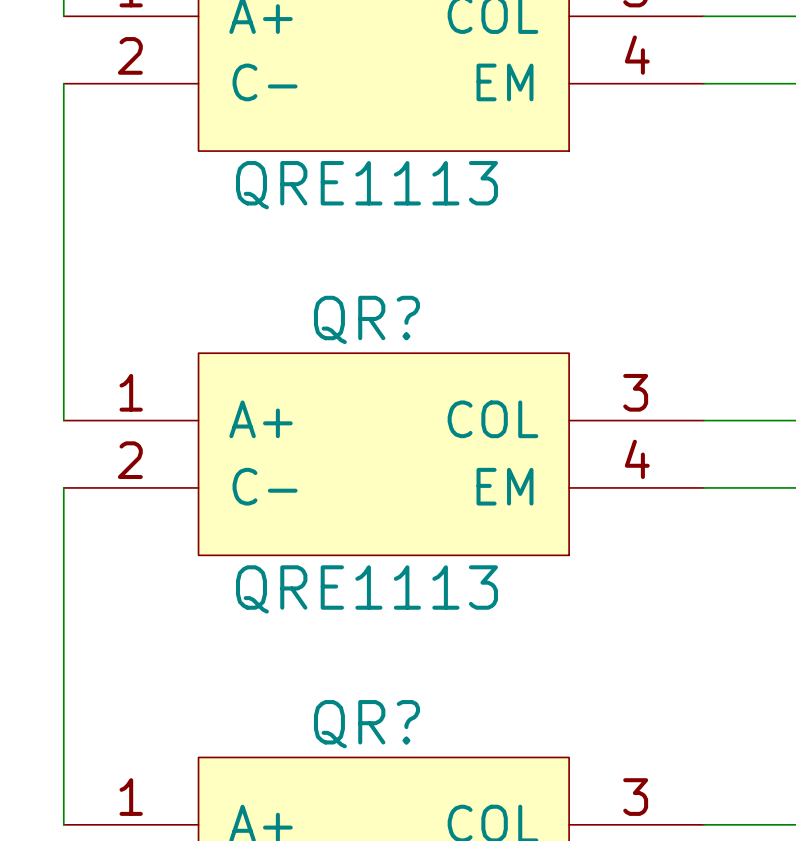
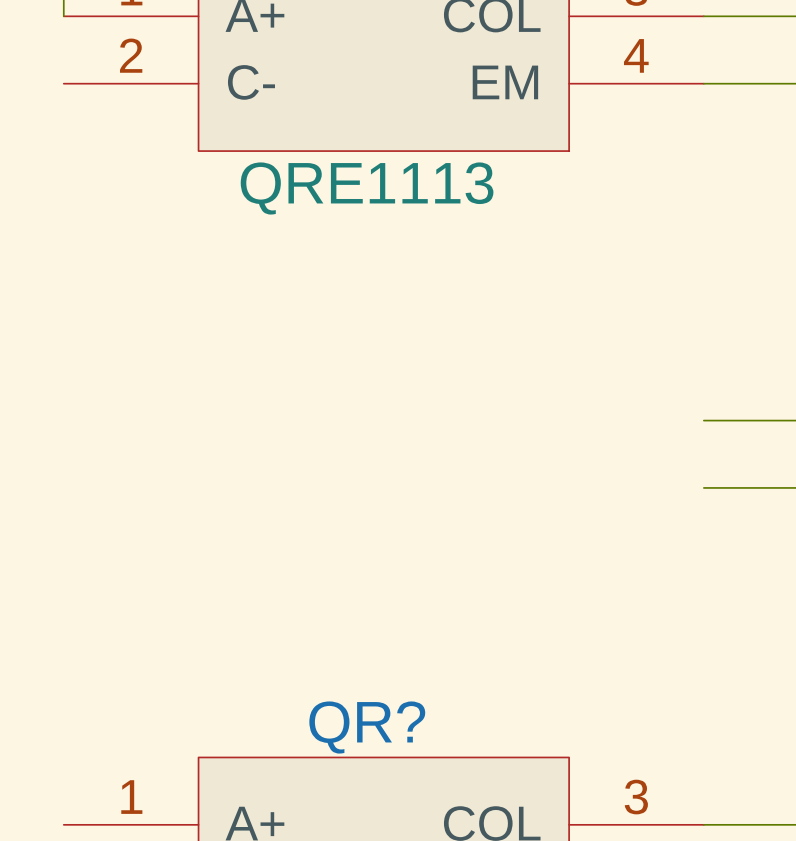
wire: (63, 83) (63, 420) -> none
QR?: QRE1113 (383, 454) -> none
wire: (63, 487) (63, 824) -> none

